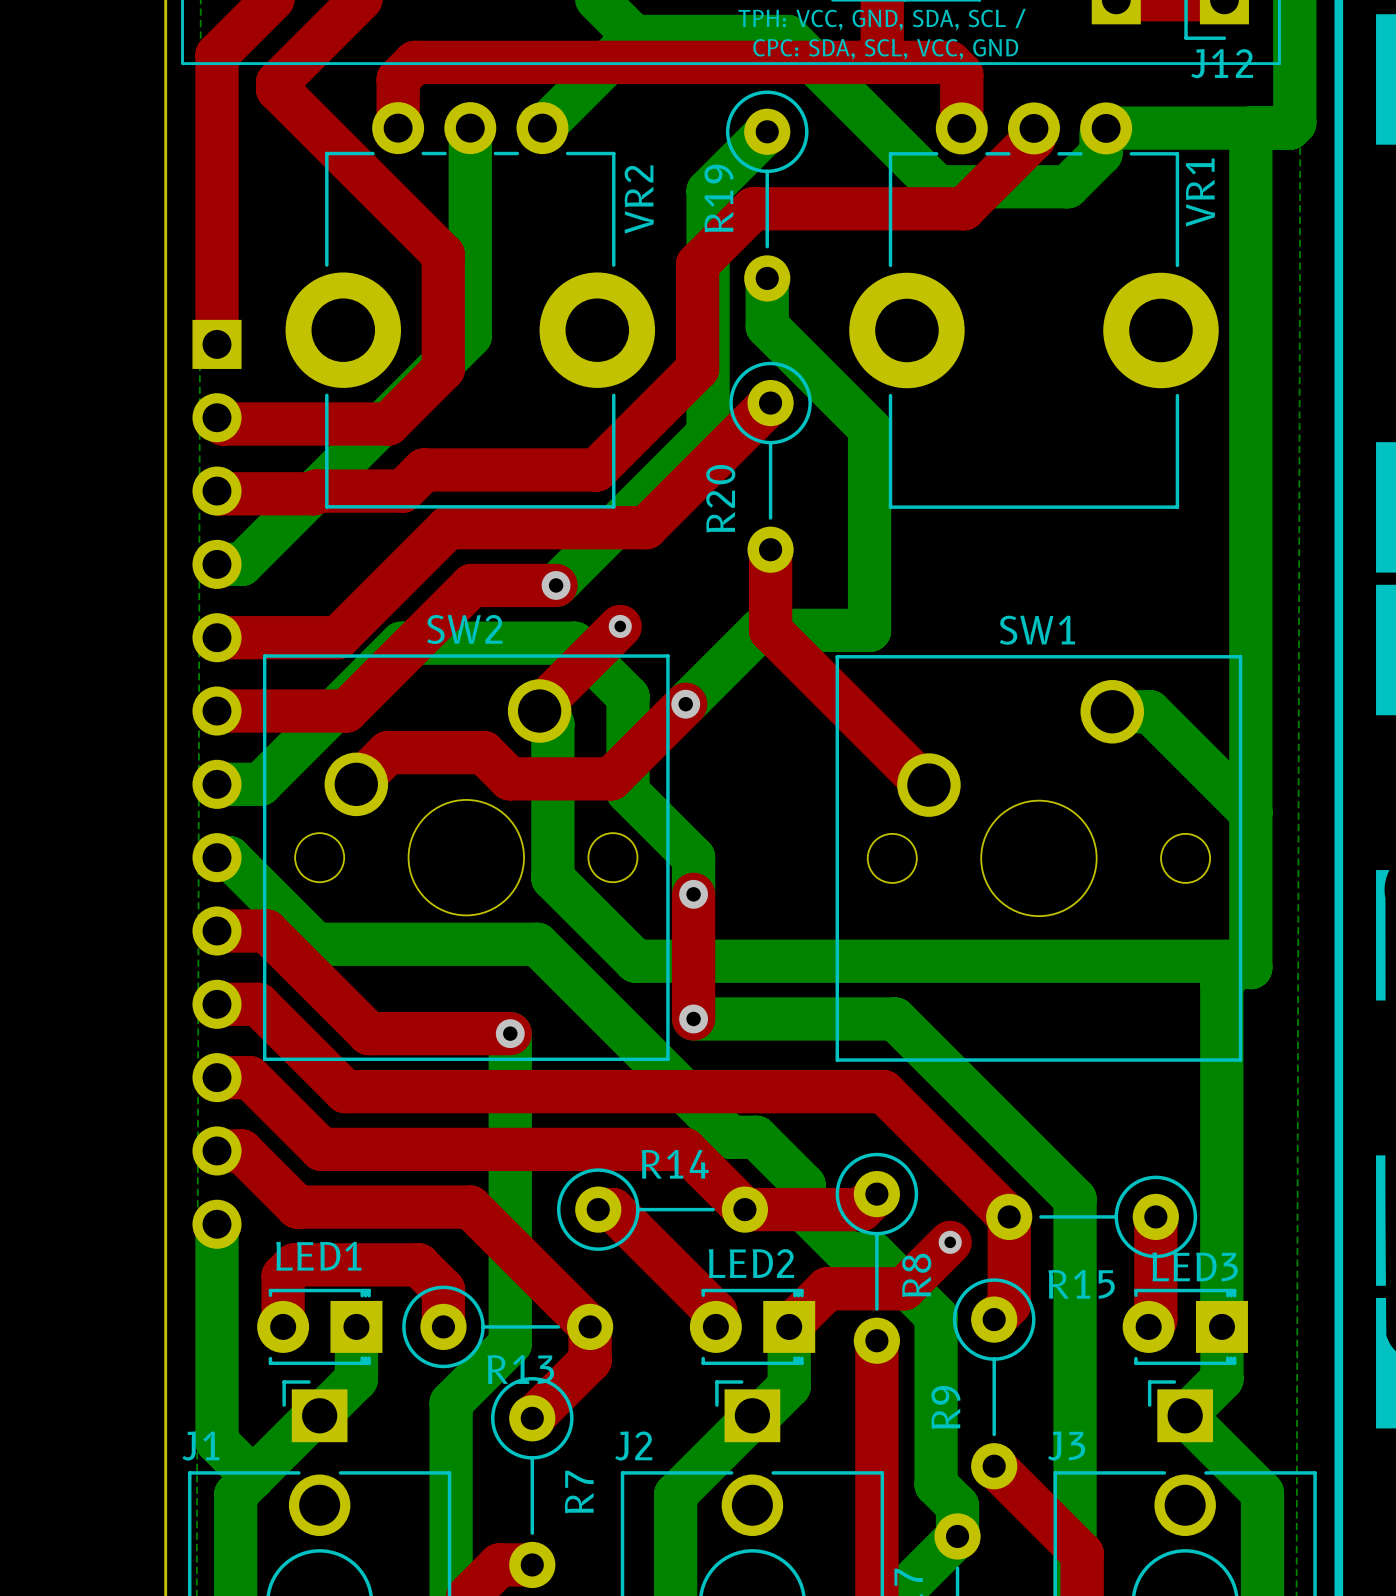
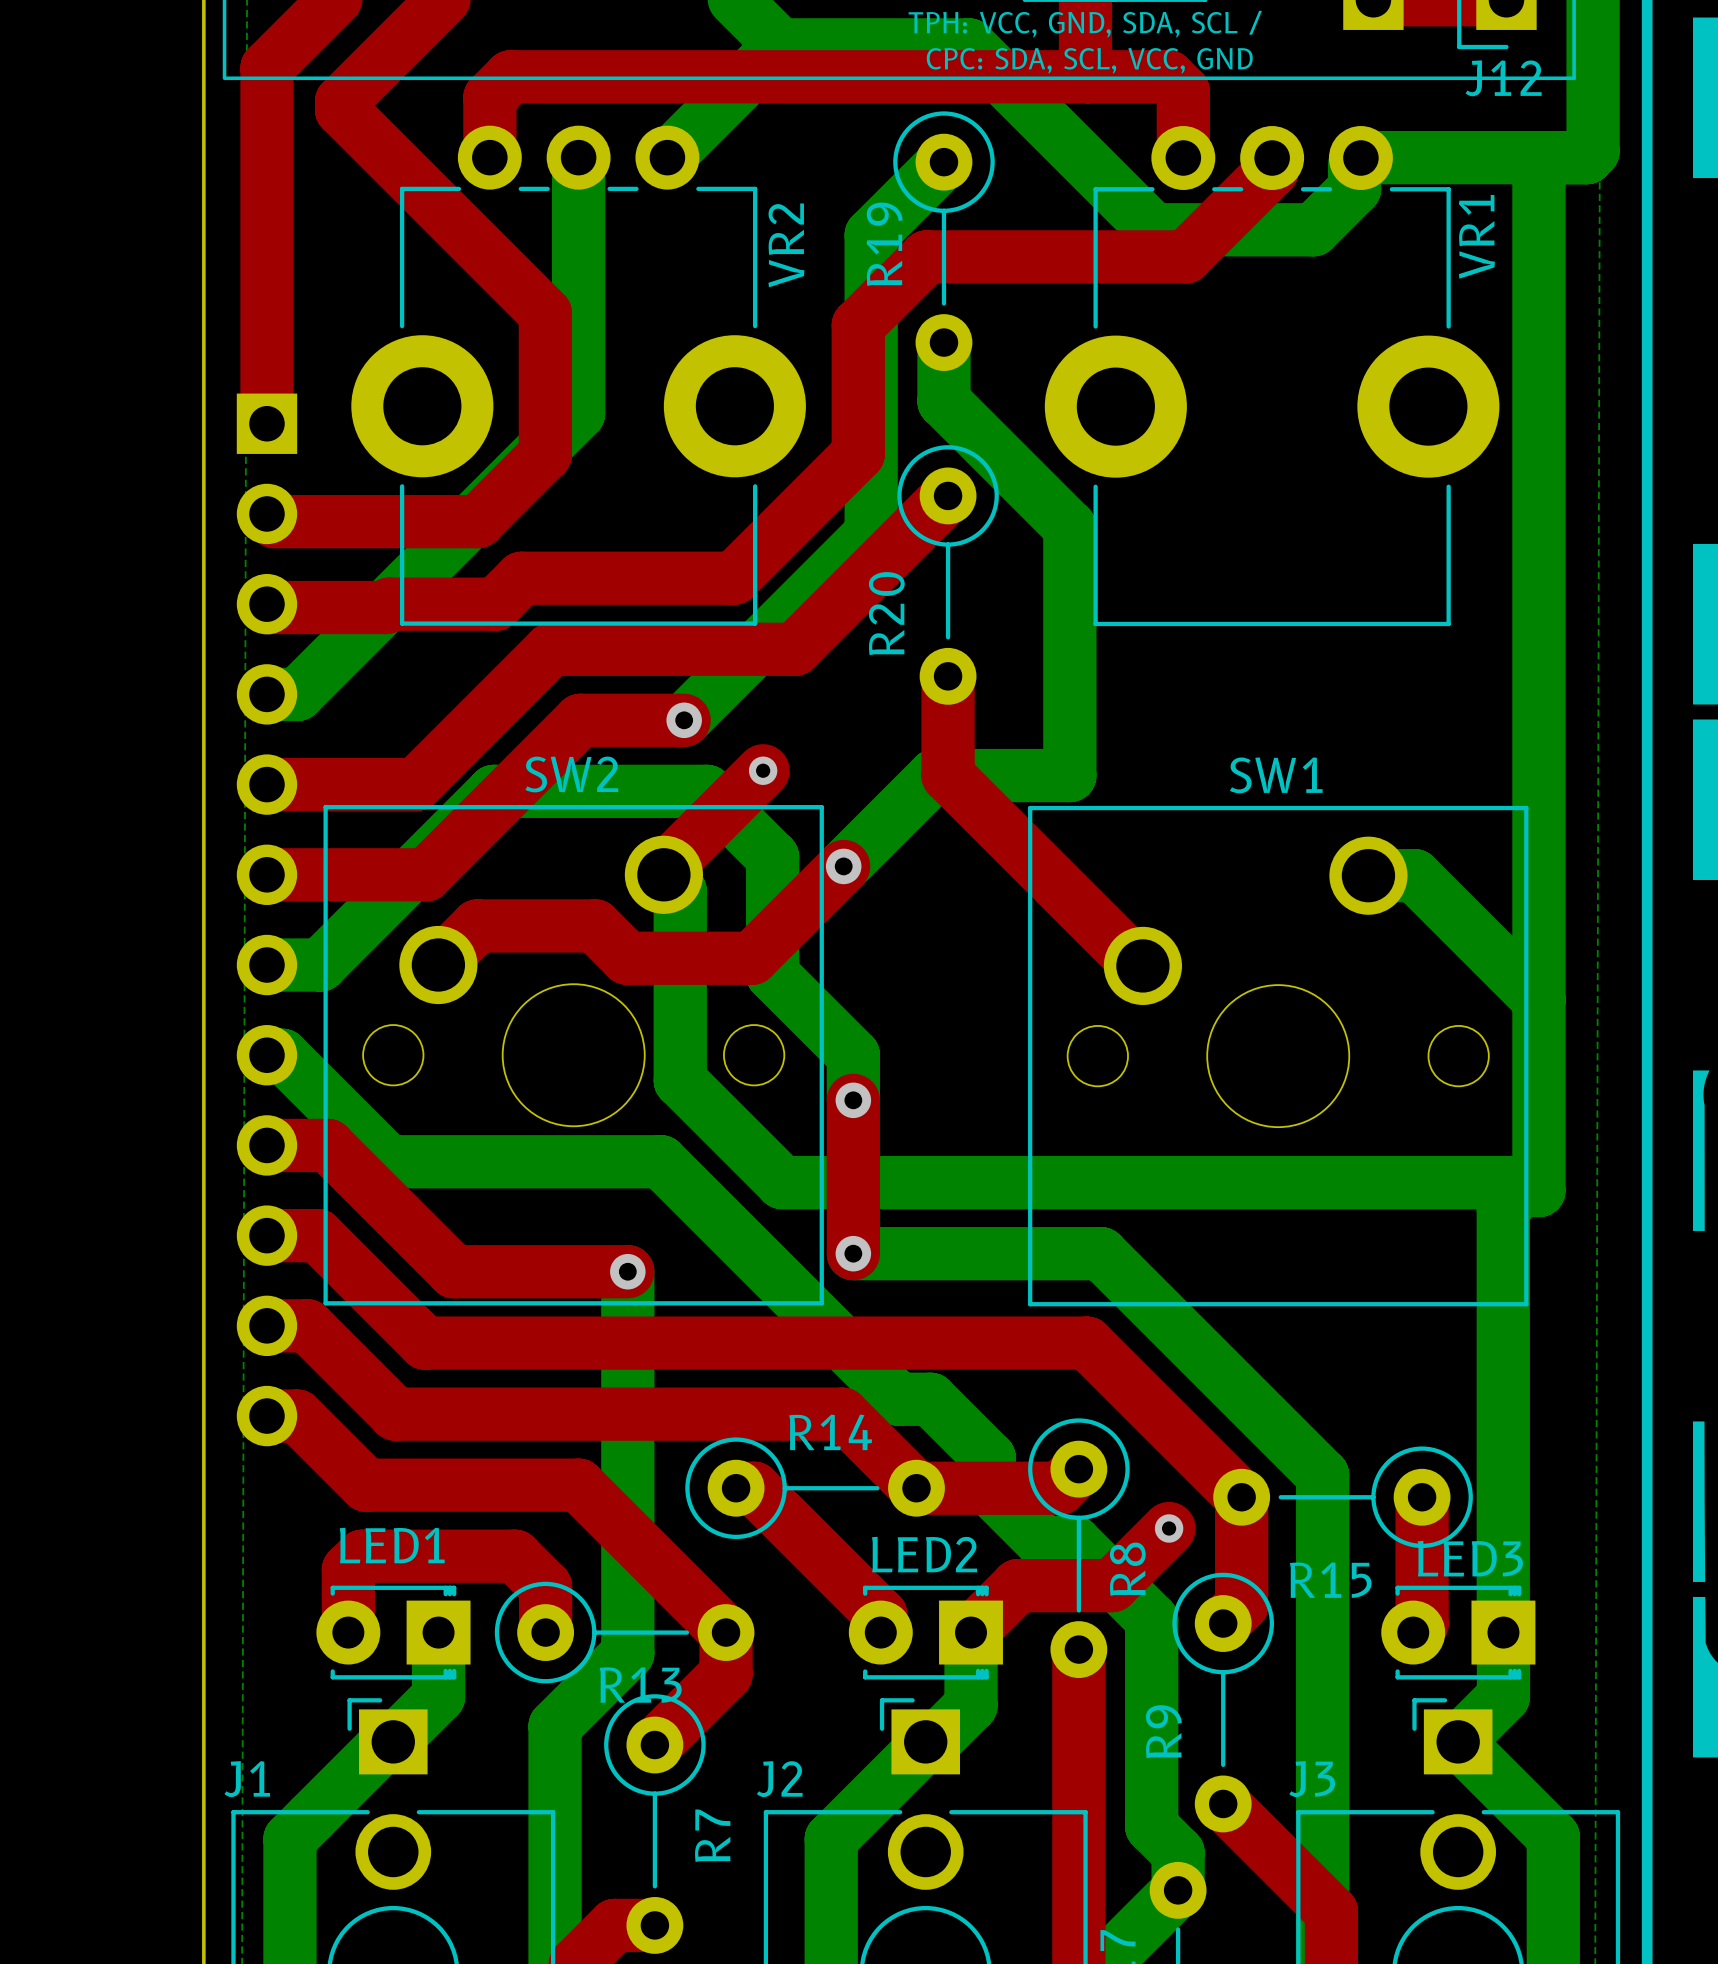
part: (217, 784) -> none
bottom track: (217, 1224) (217, 1441) (252, 1477) -> none

